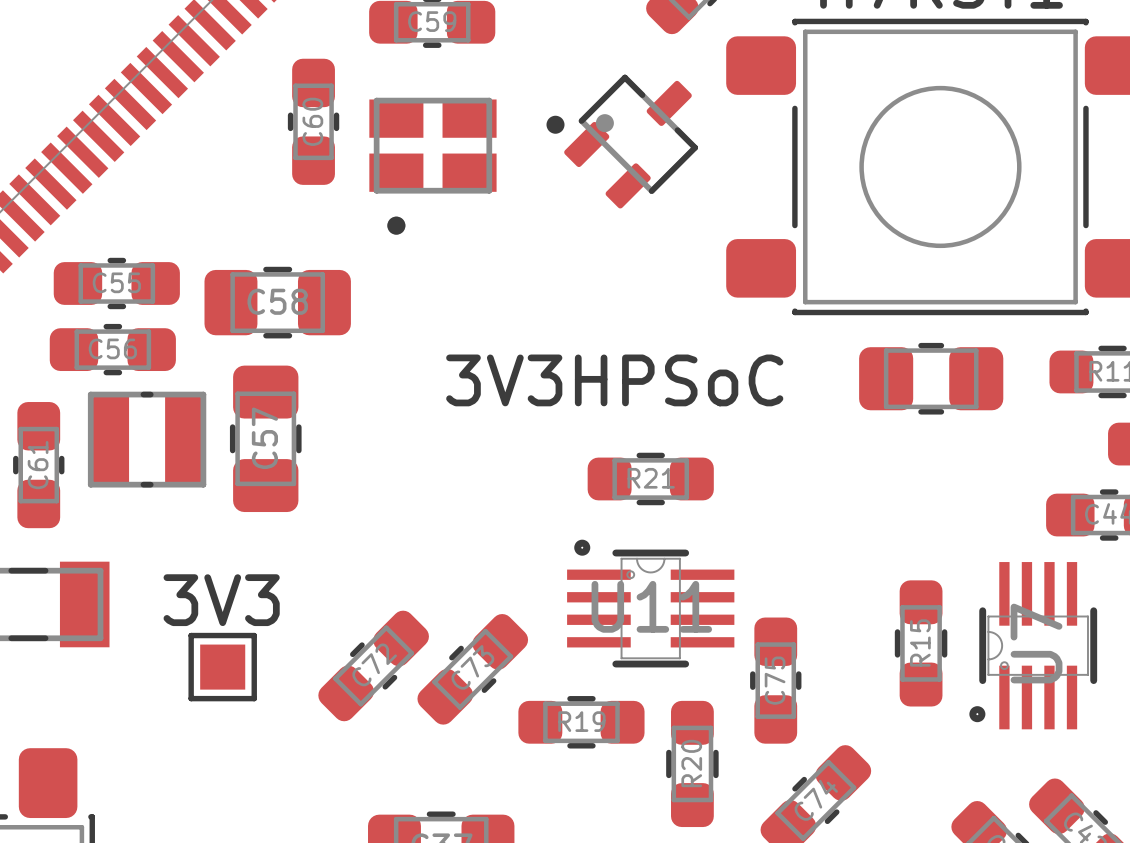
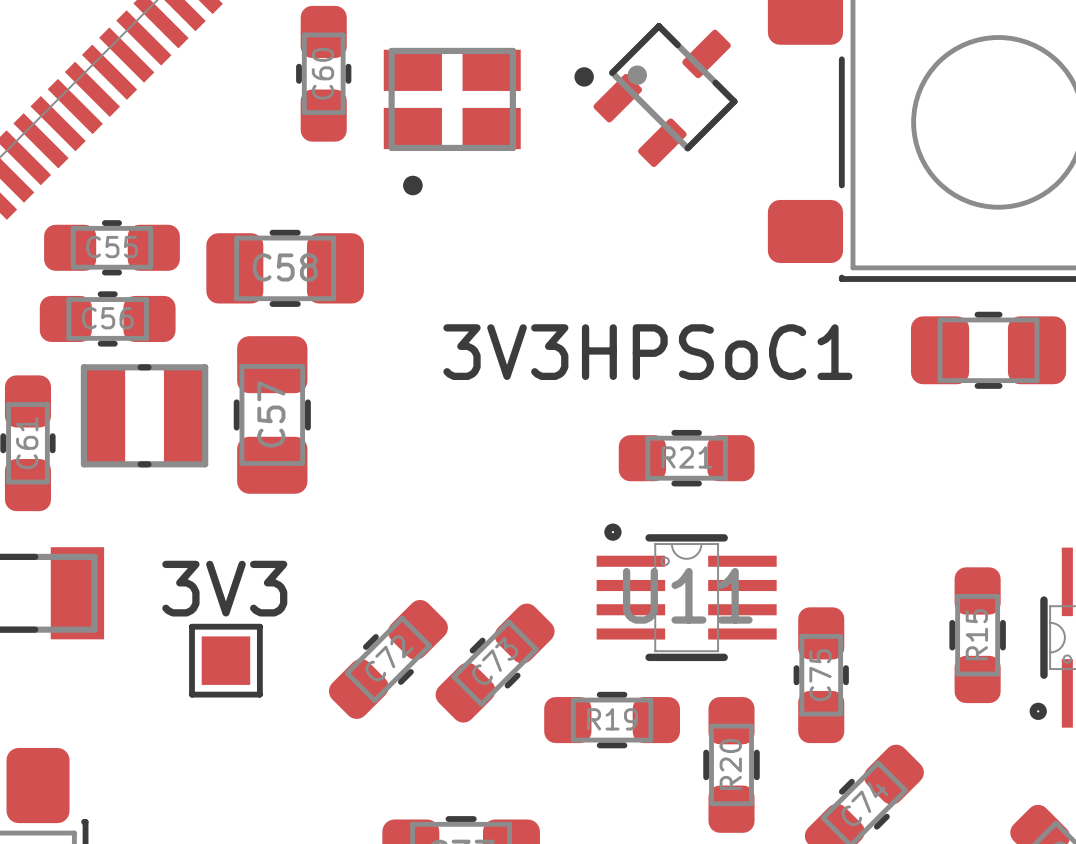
3V3HPSoC name: 3V3HPSoC (614, 380) -> 3V3HPSoC1 (647, 352)

